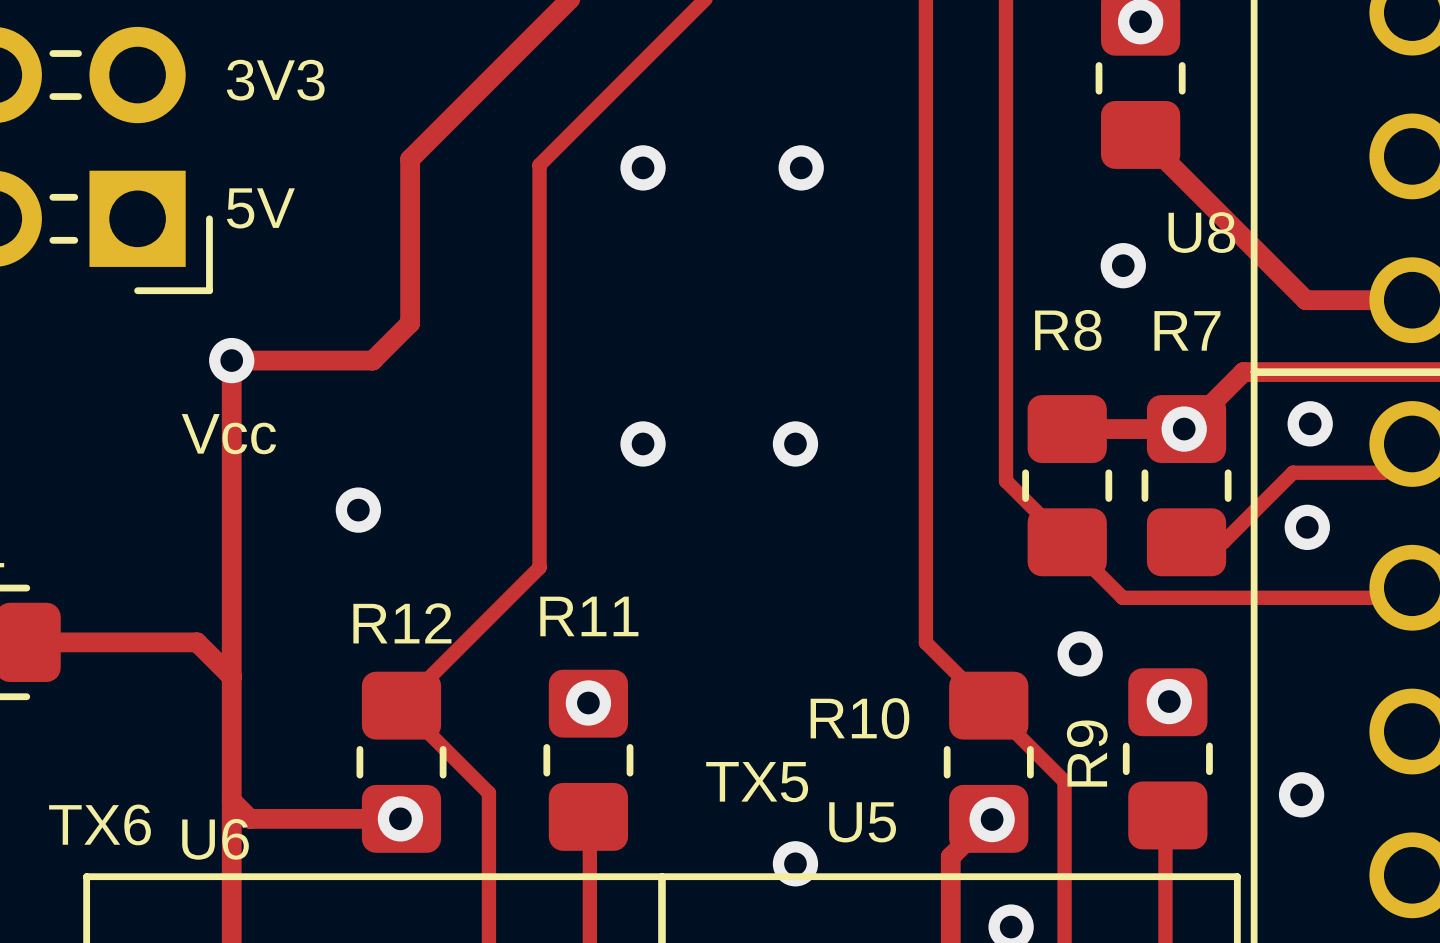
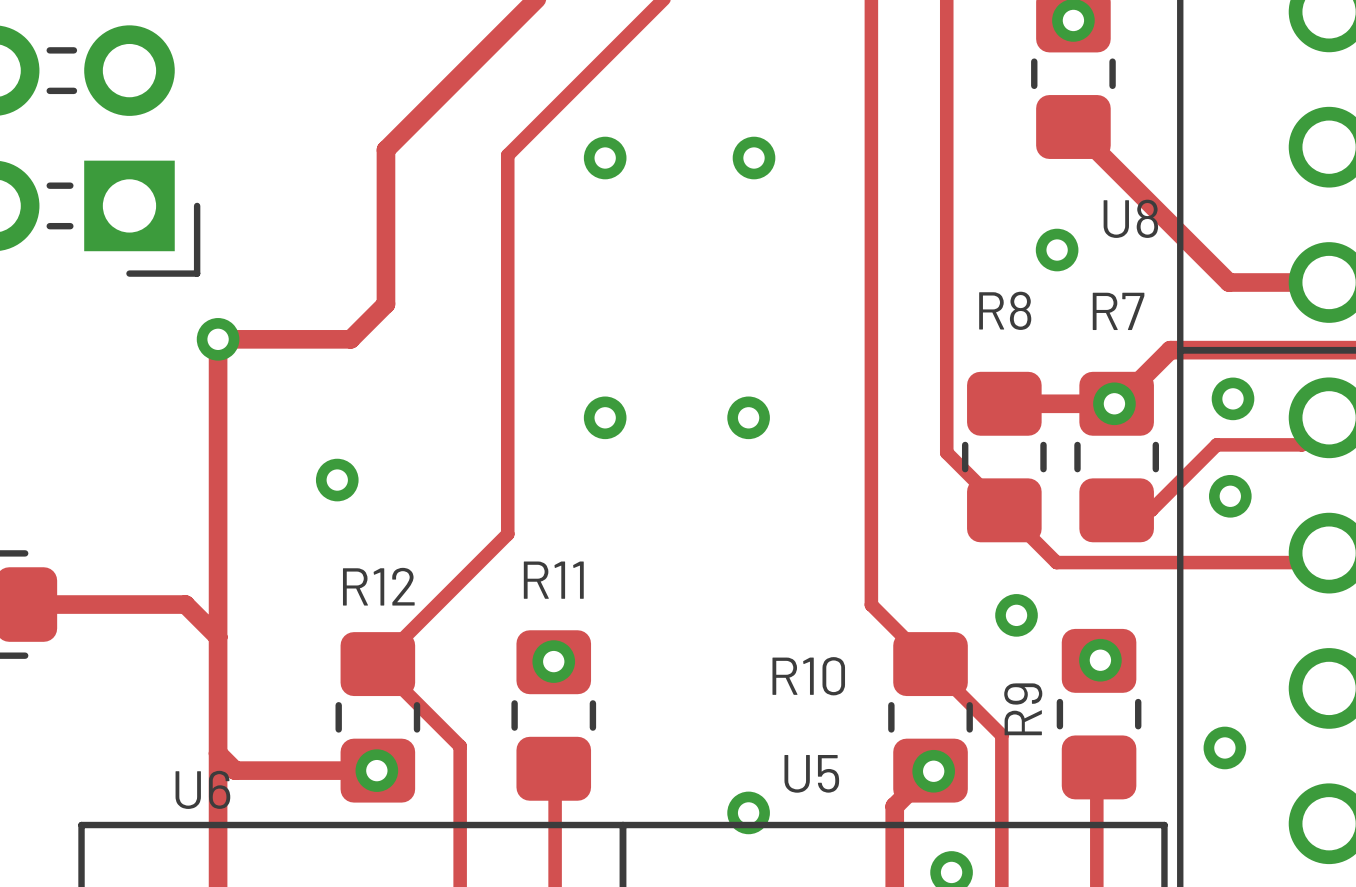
text: 3V3 (275, 80) -> none
text: 5V (260, 208) -> none
text: Vcc (228, 434) -> none
text: TX5 (757, 782) -> none
text: TX6 (100, 824) -> none

